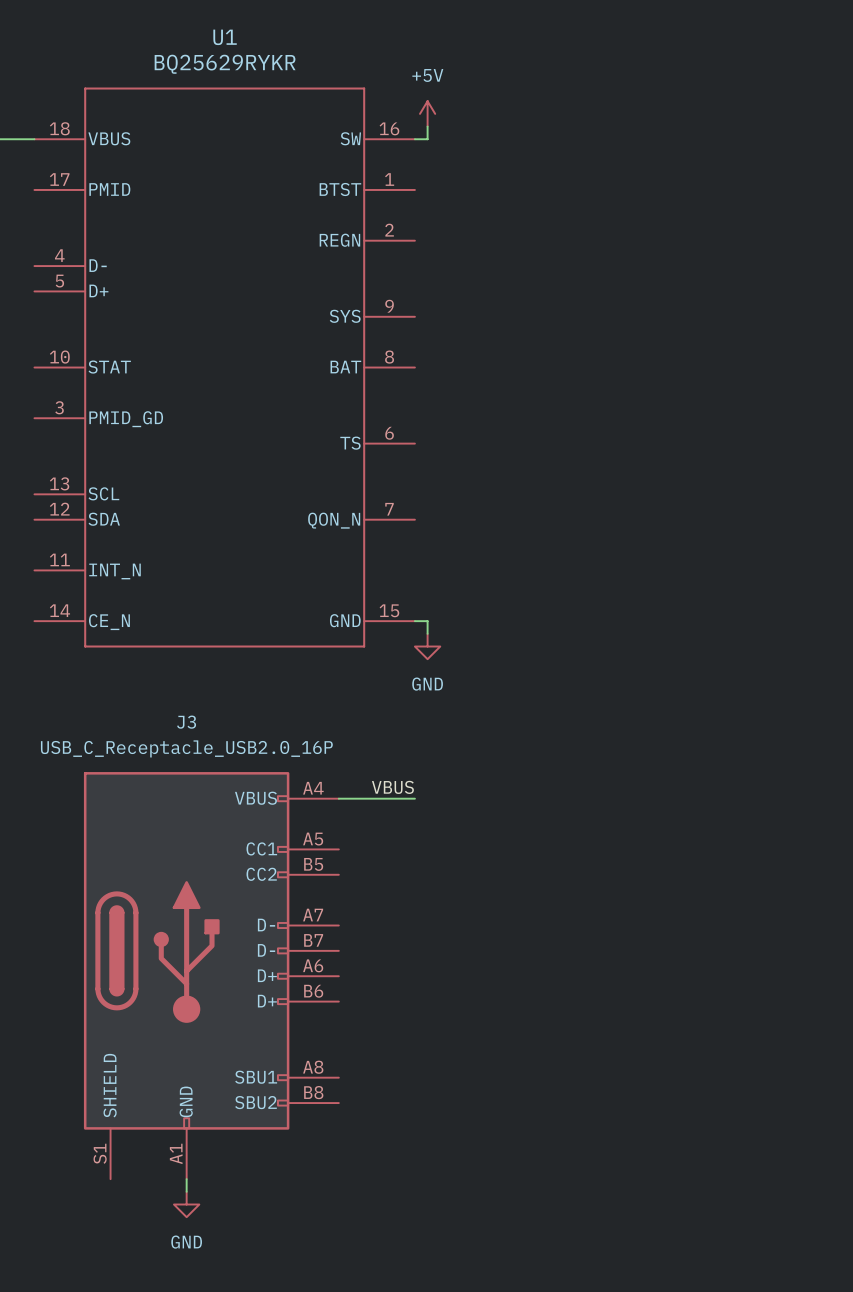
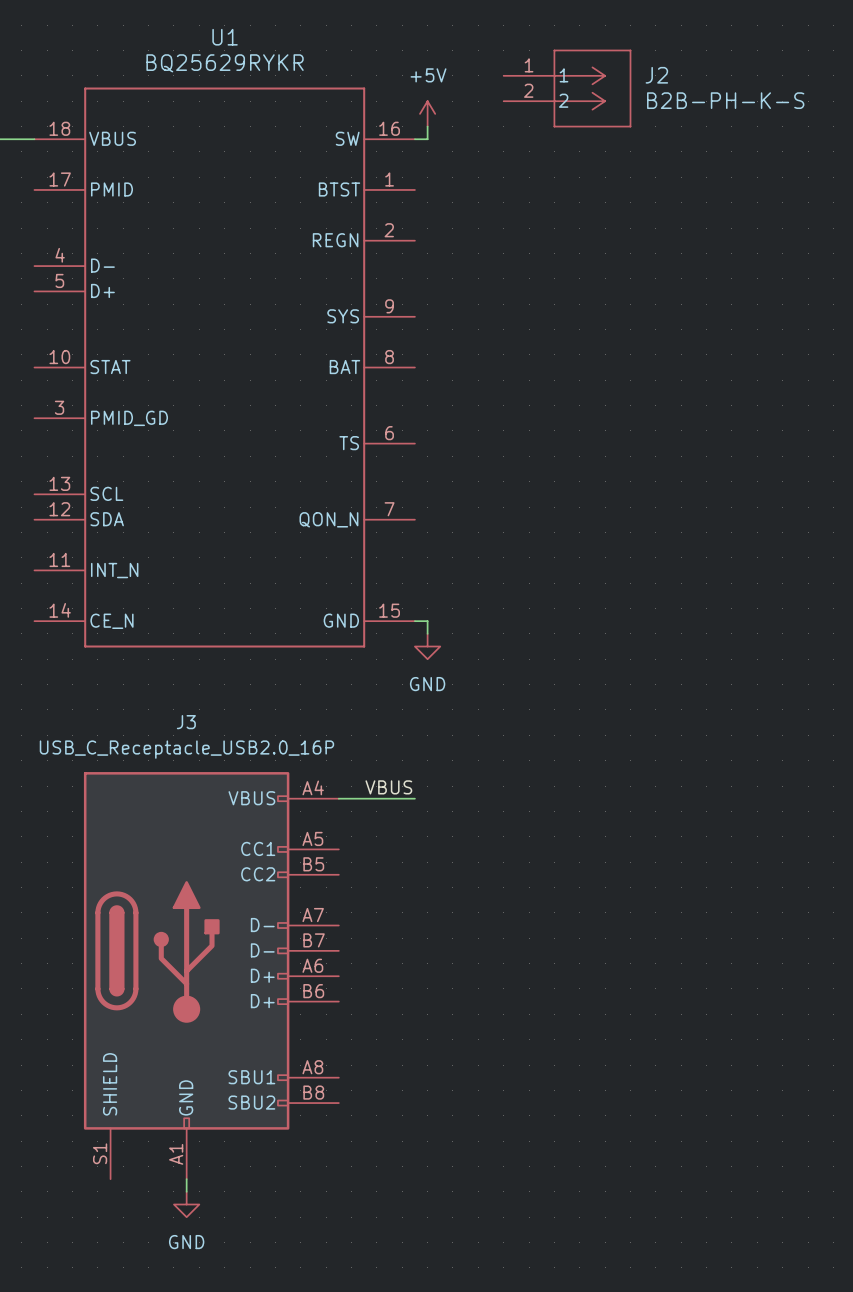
J2: none -> B2B-PH-K-S (567, 88)

